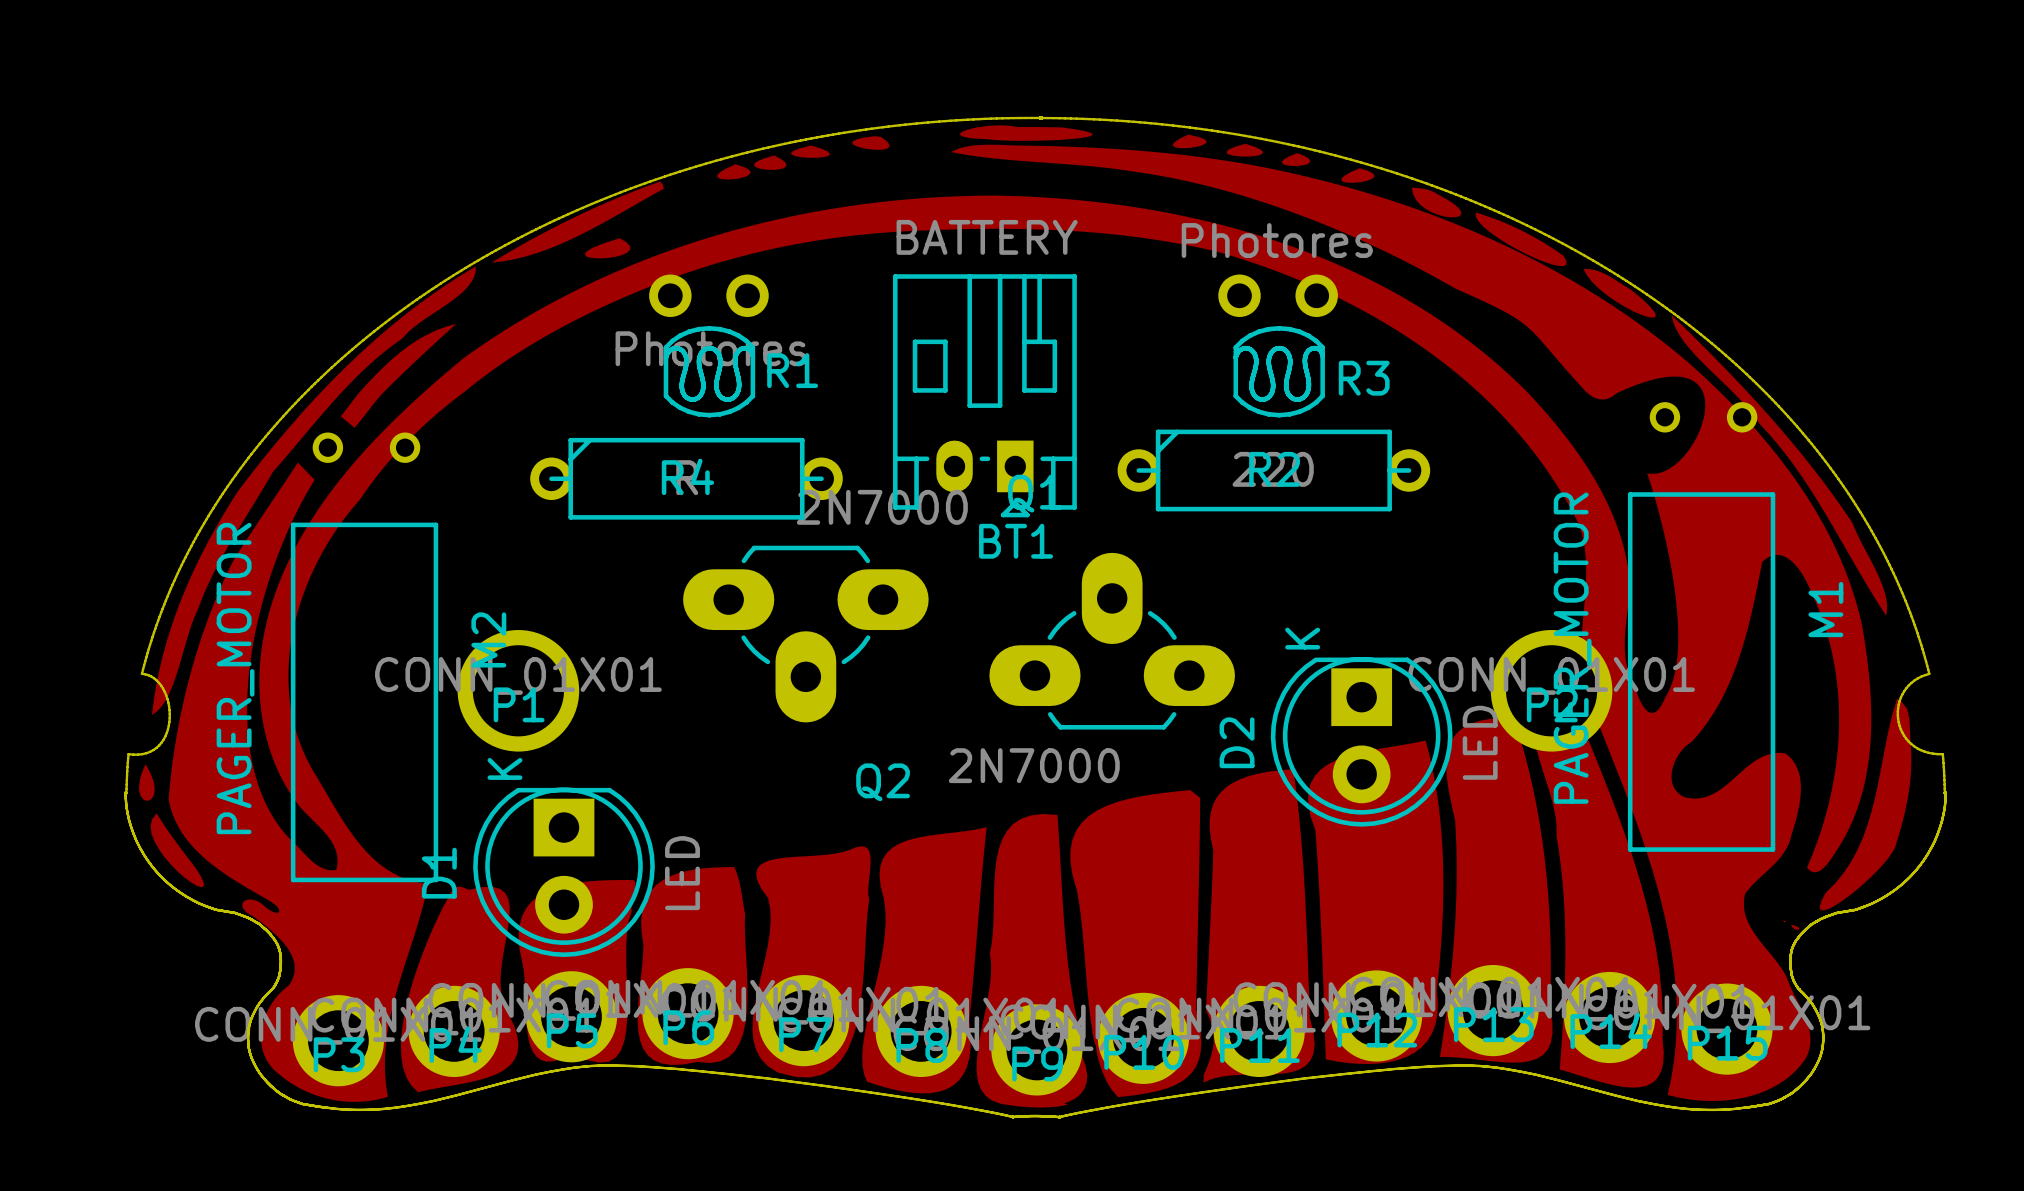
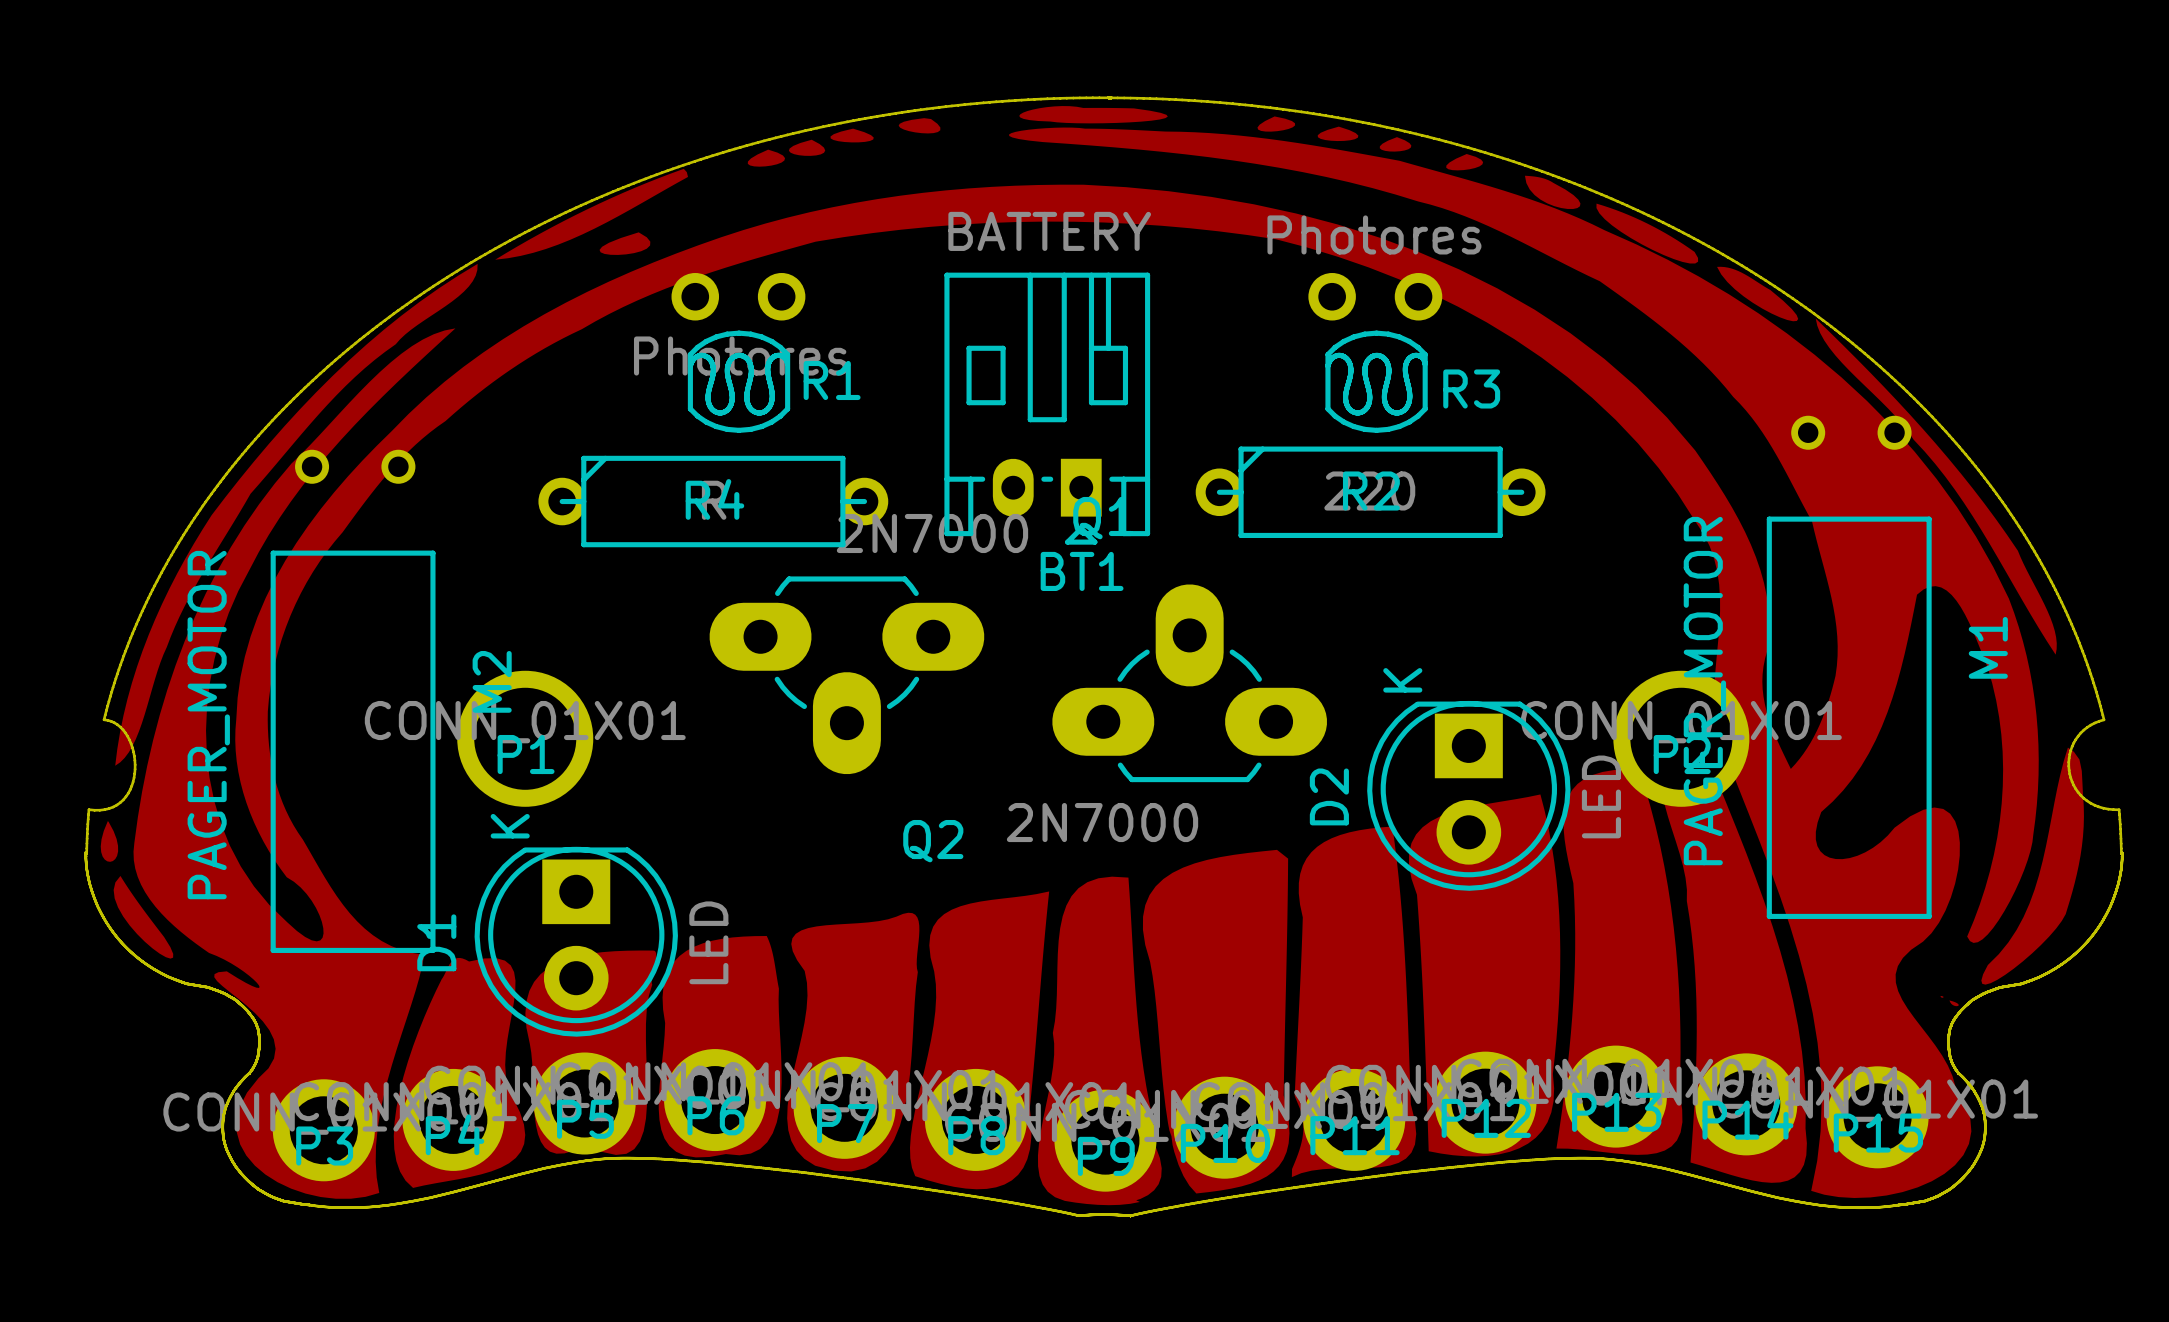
drawing shape: [124, 116, 1947, 1119] -> [84, 96, 2124, 1218]

